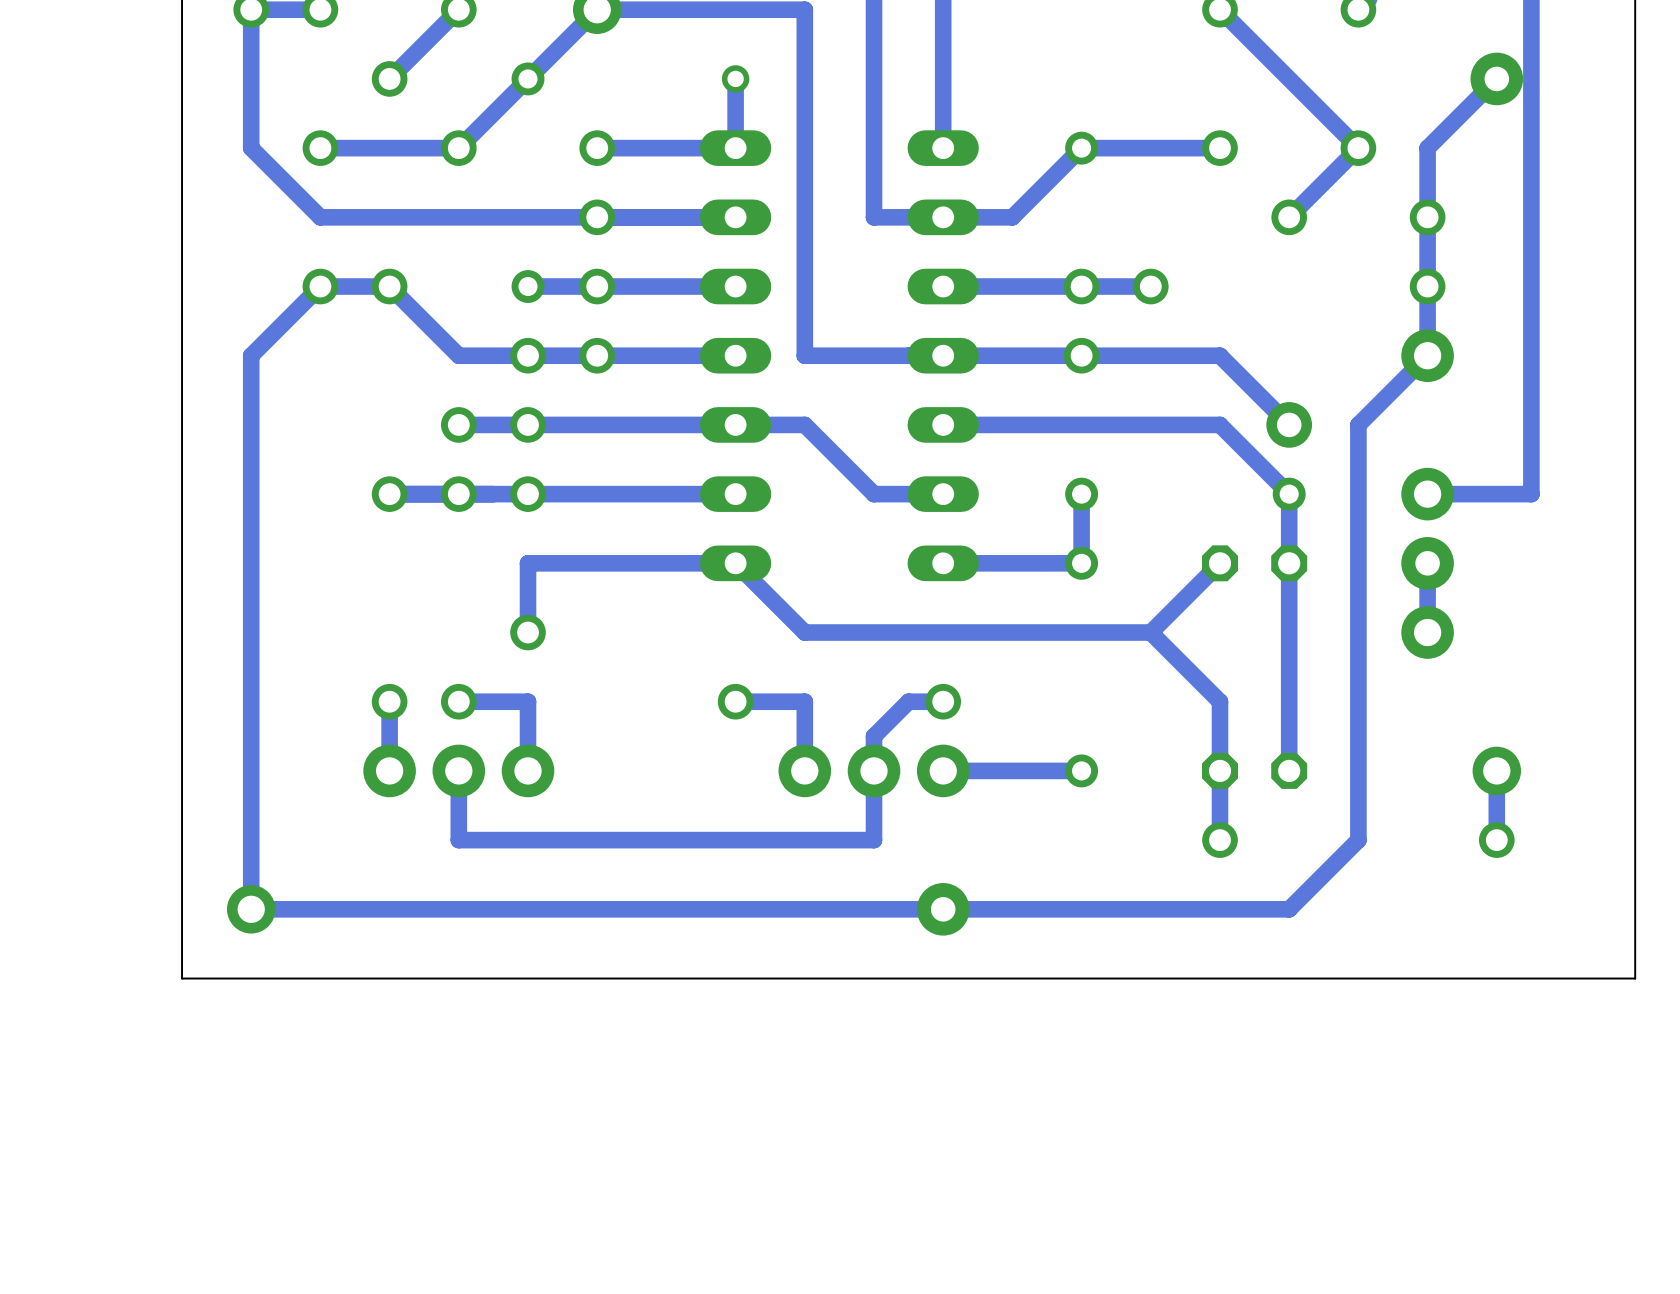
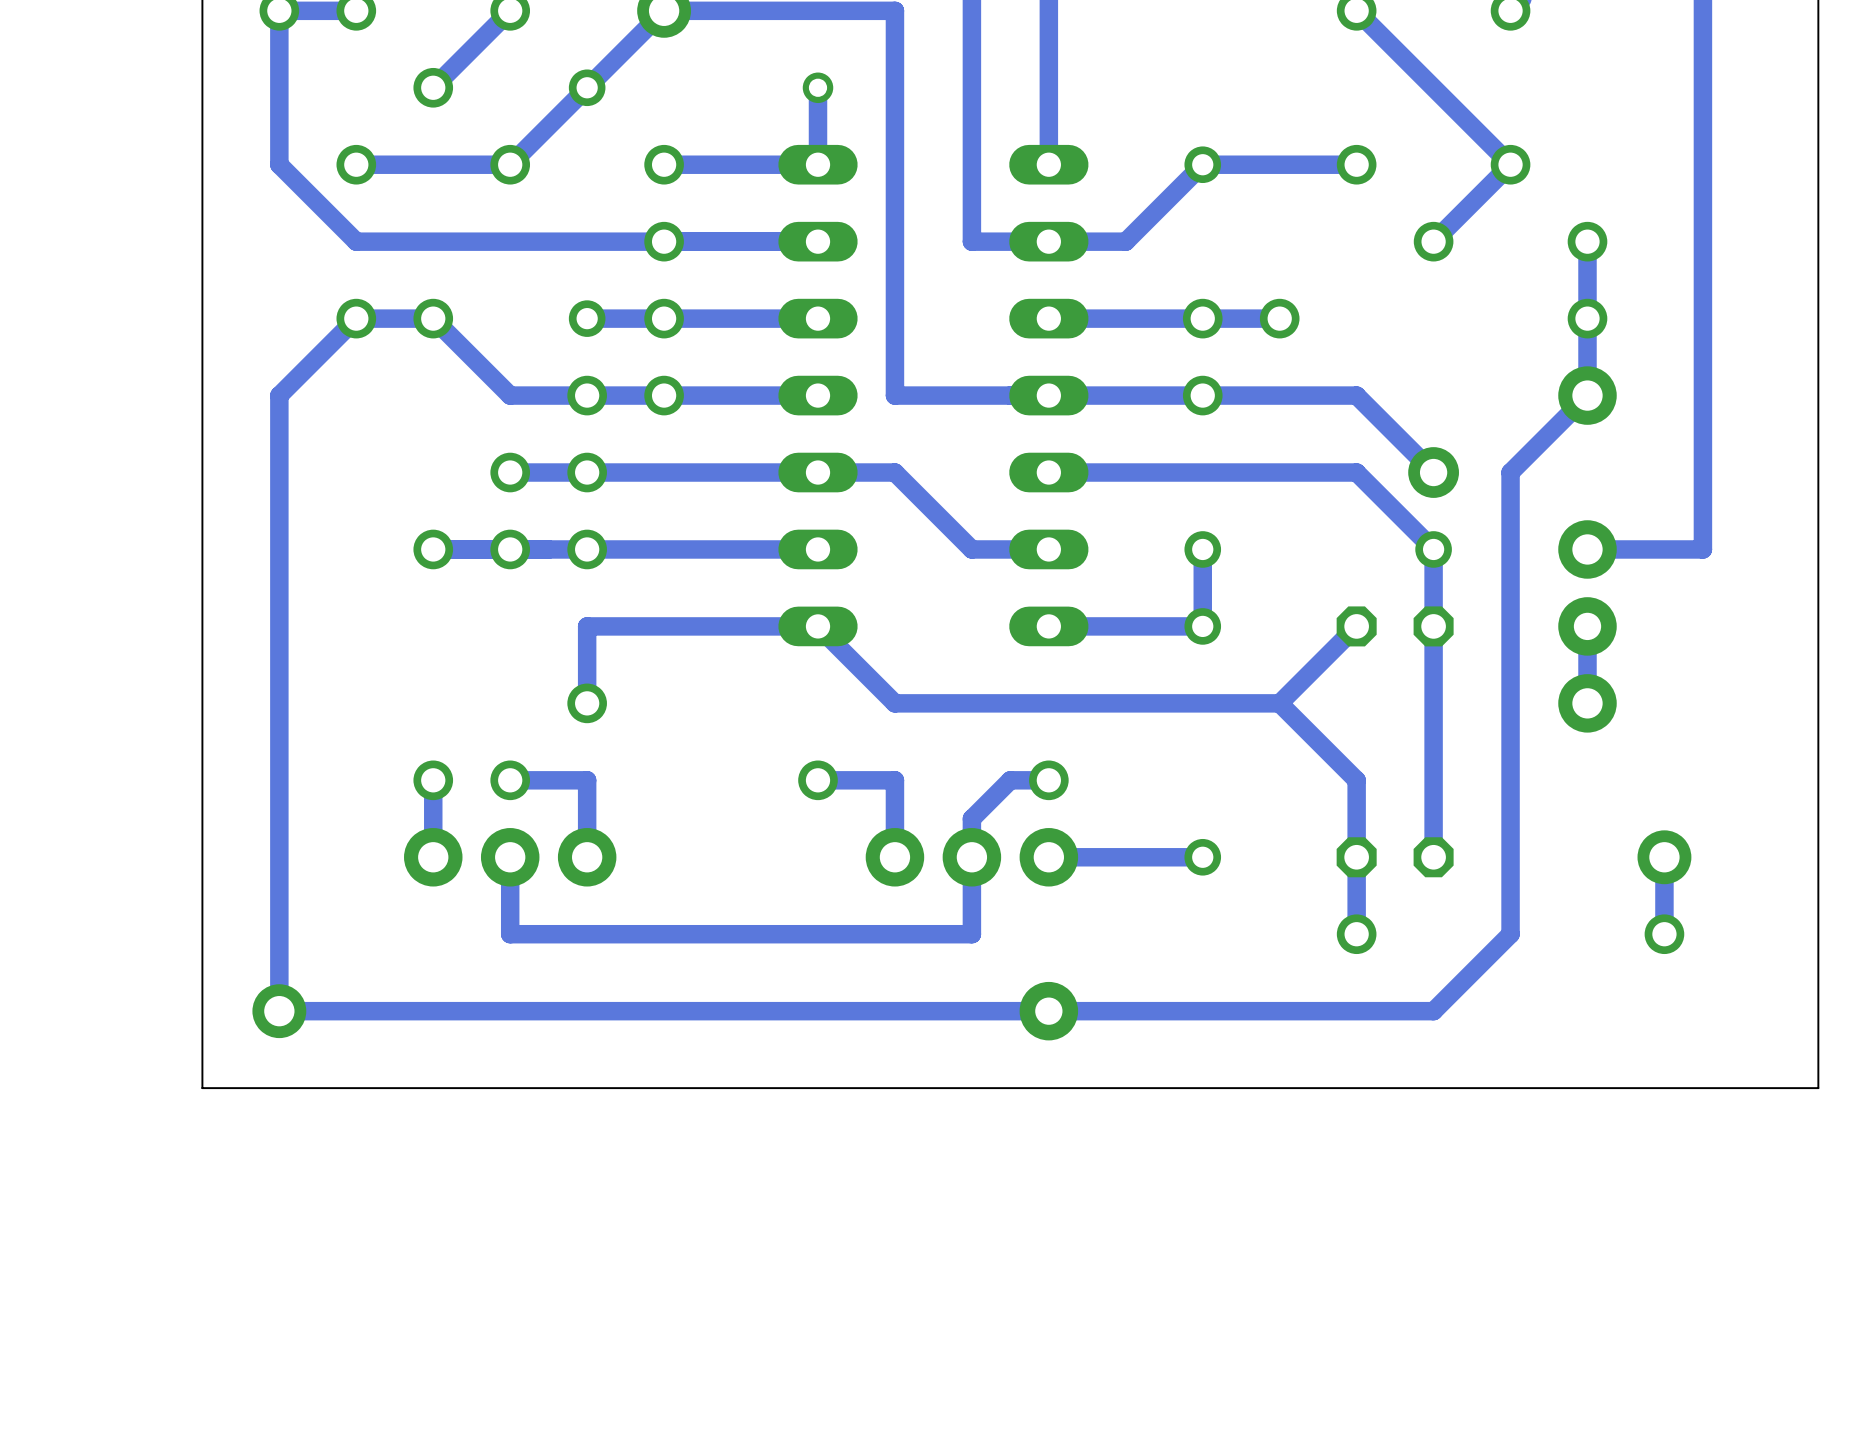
track: (1496, 78) (1427, 148) (1427, 217) -> none
via: (1496, 78) -> none

